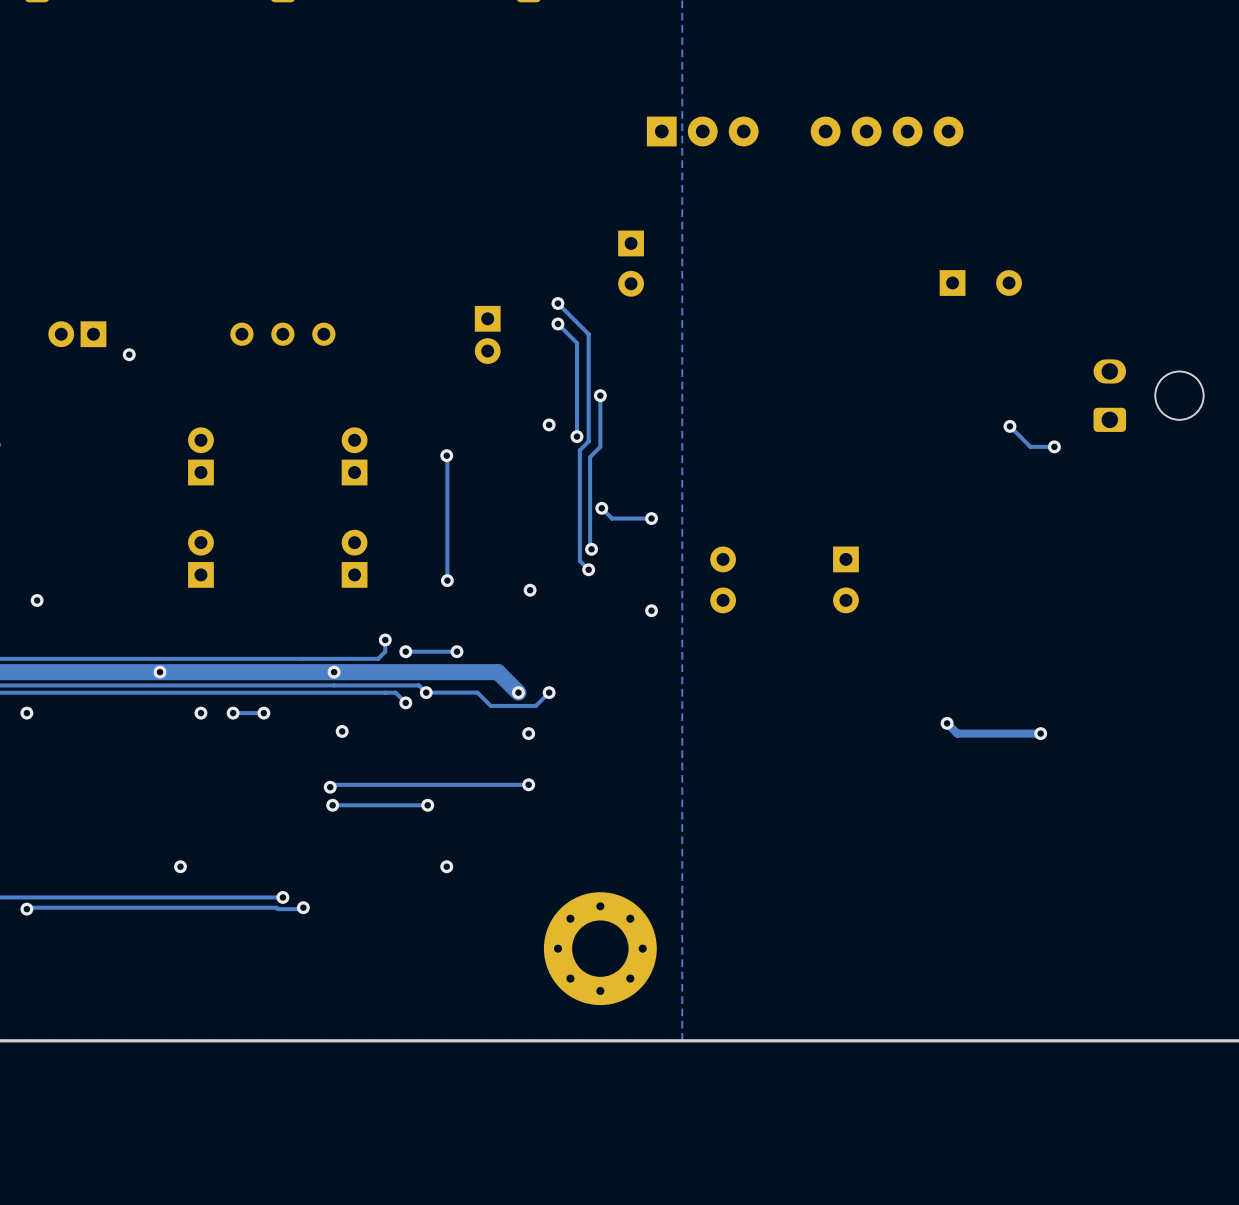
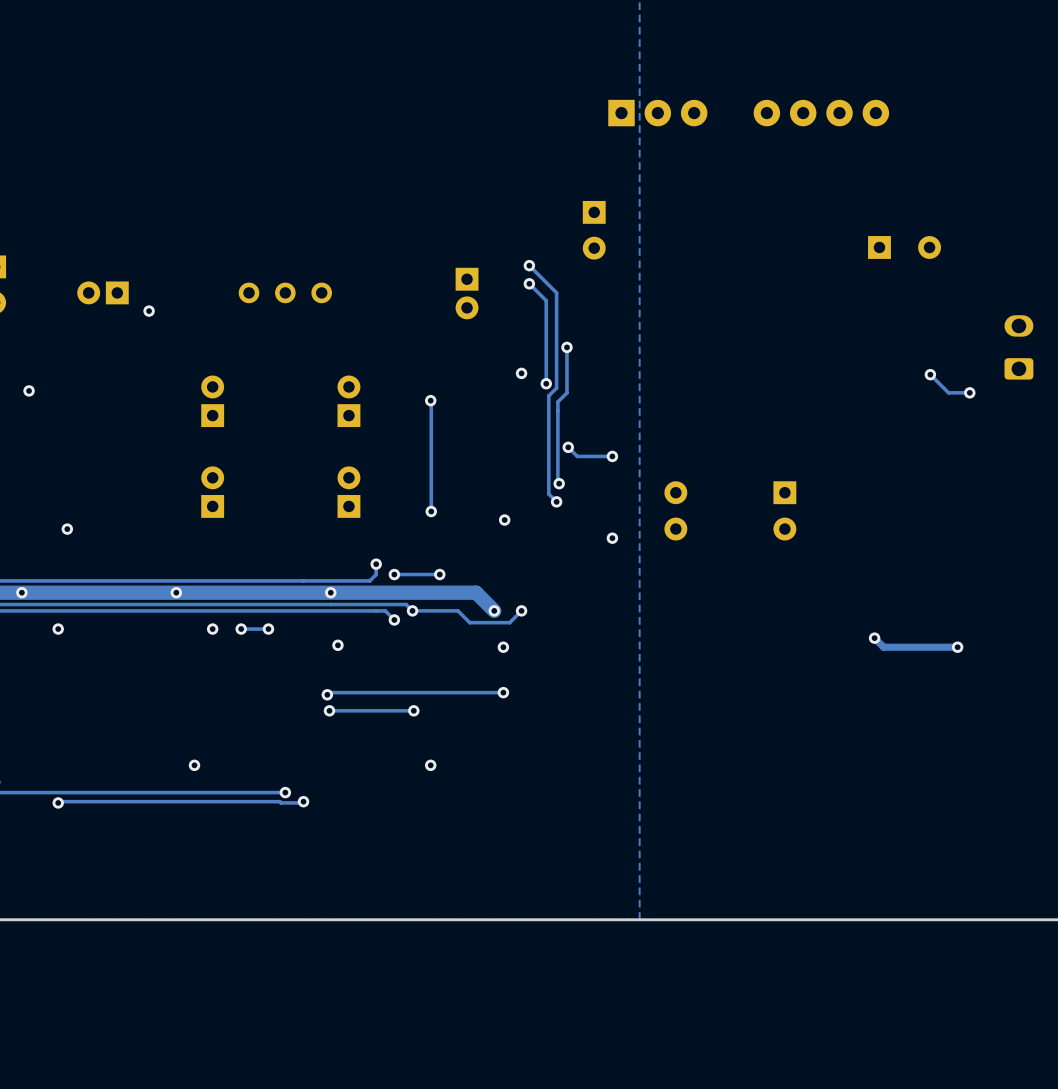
part: (600, 948) -> none

